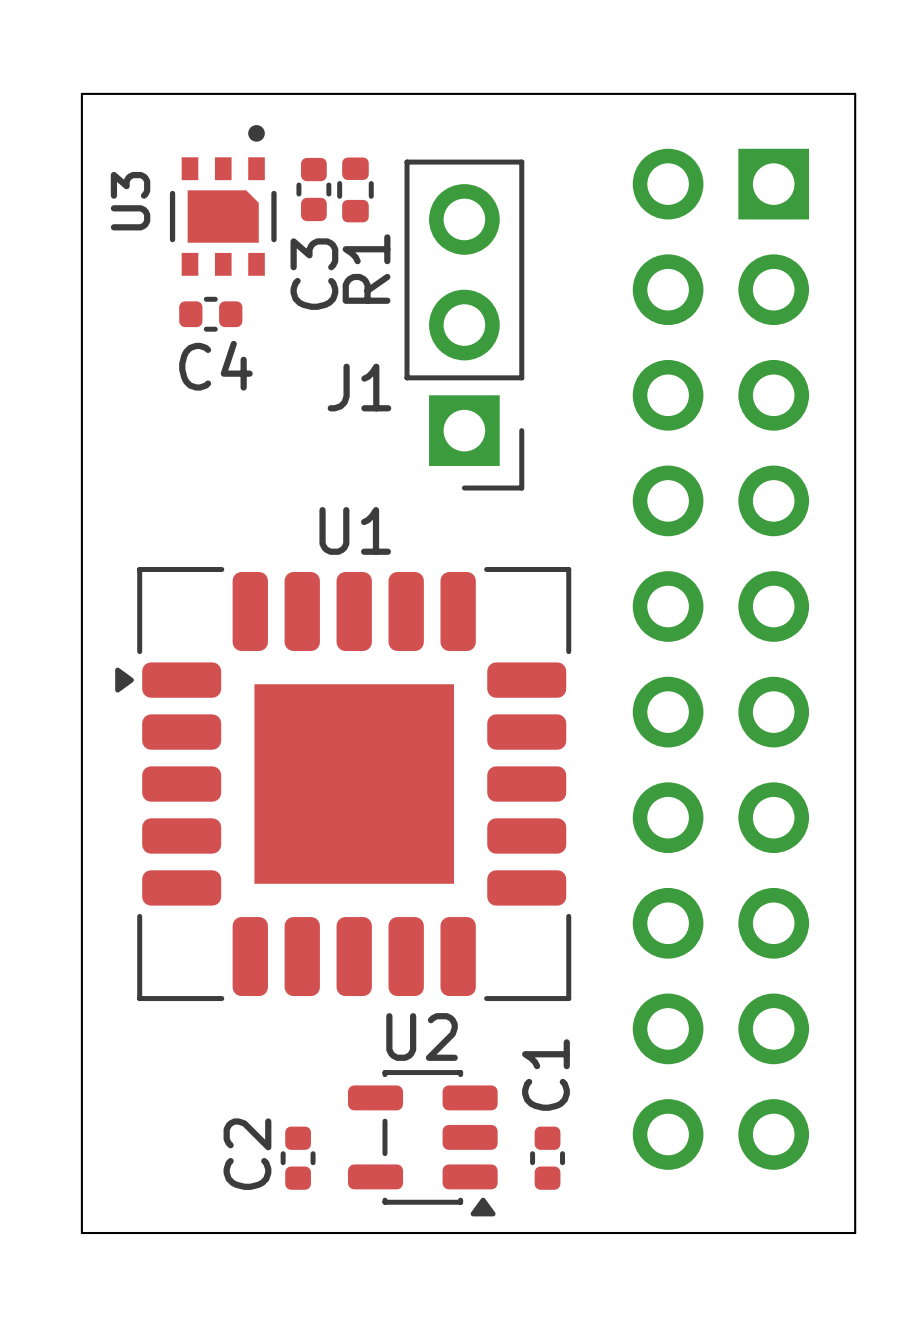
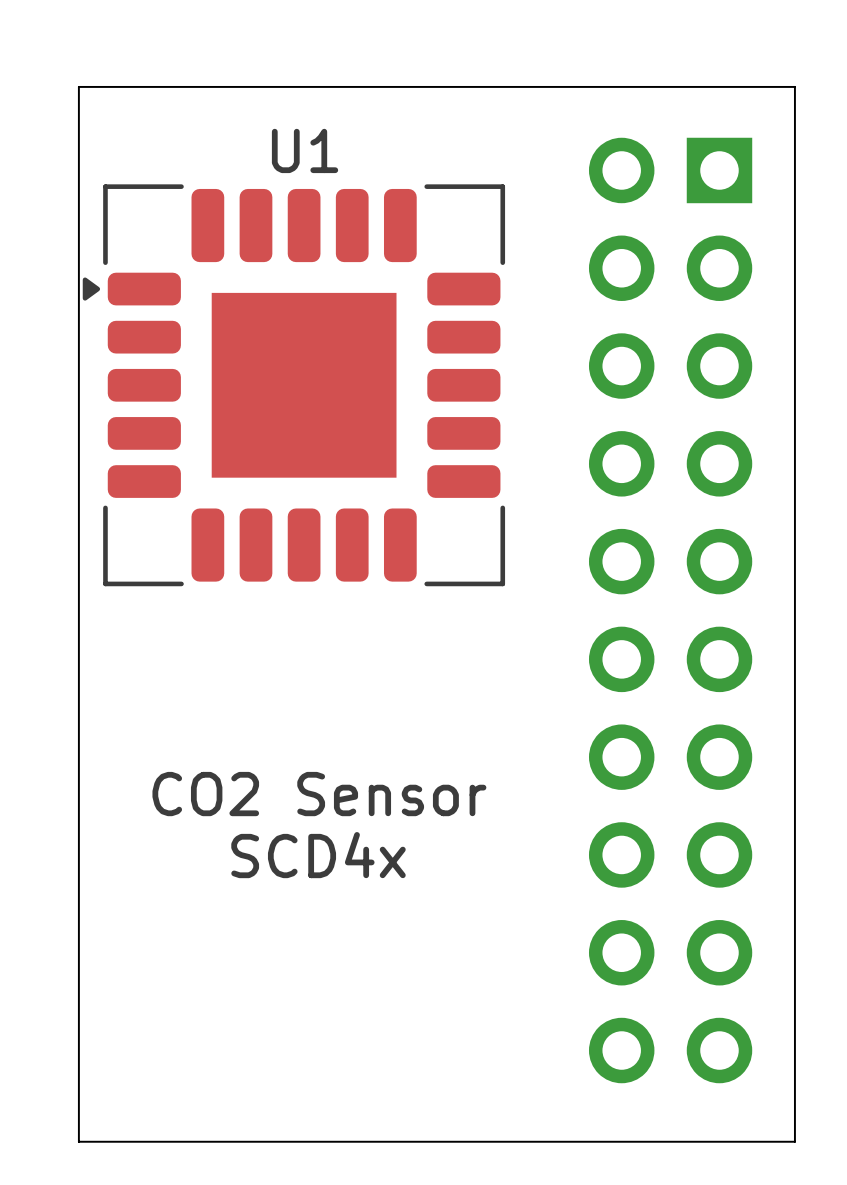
C3: (313, 189) -> none
R1: (355, 189) -> none
U3: (223, 200) -> none
C4: (210, 314) -> none
J1: (464, 325) -> none
U1 position: (343, 784) -> (293, 385)
text: none -> CO2 Sensor (319, 794)
text: none -> SCD4x (318, 855)
U2: (422, 1143) -> none
C2: (298, 1158) -> none
C1: (547, 1158) -> none

